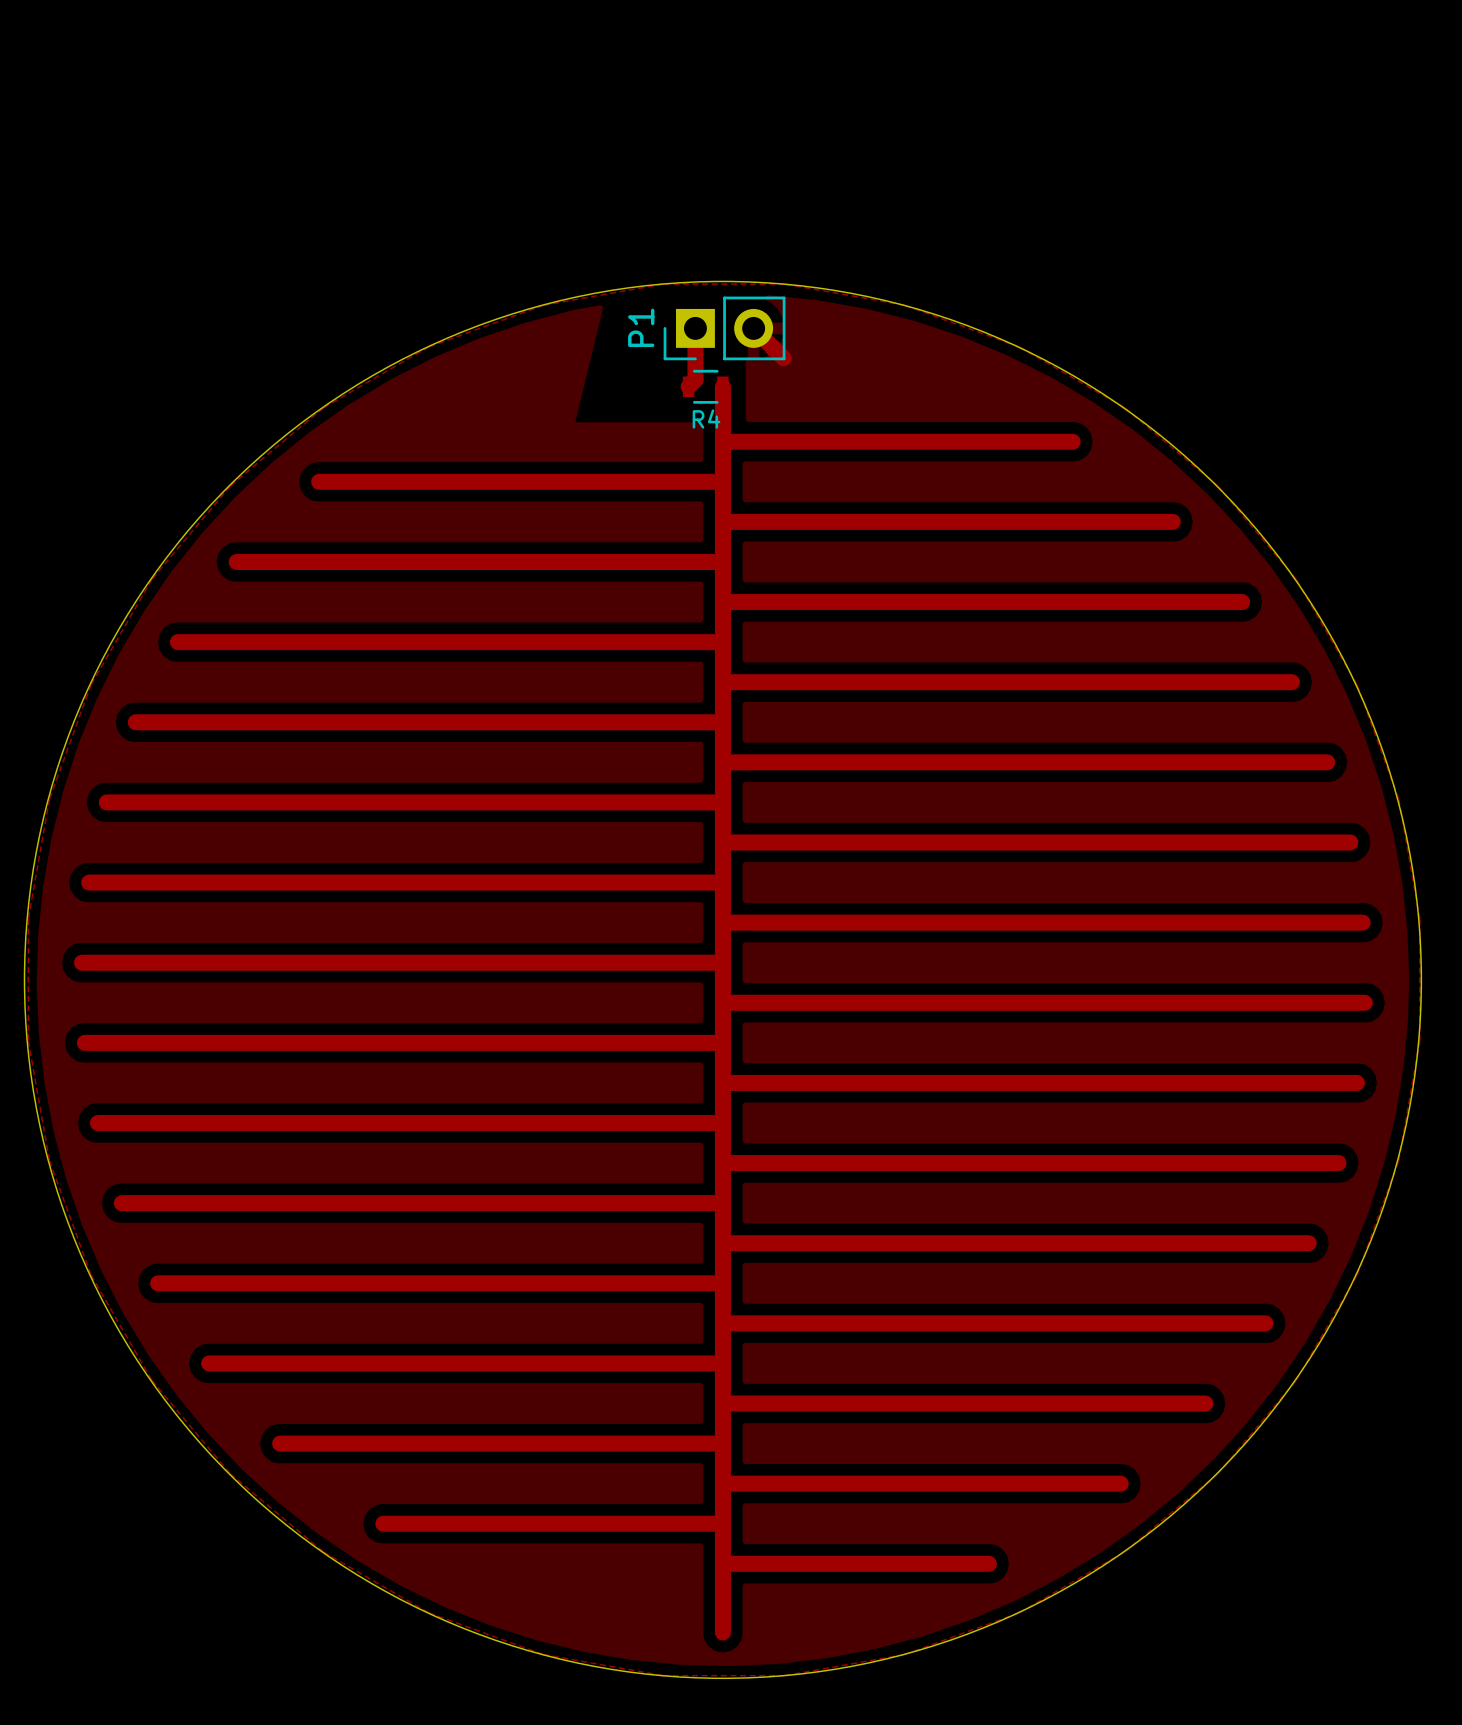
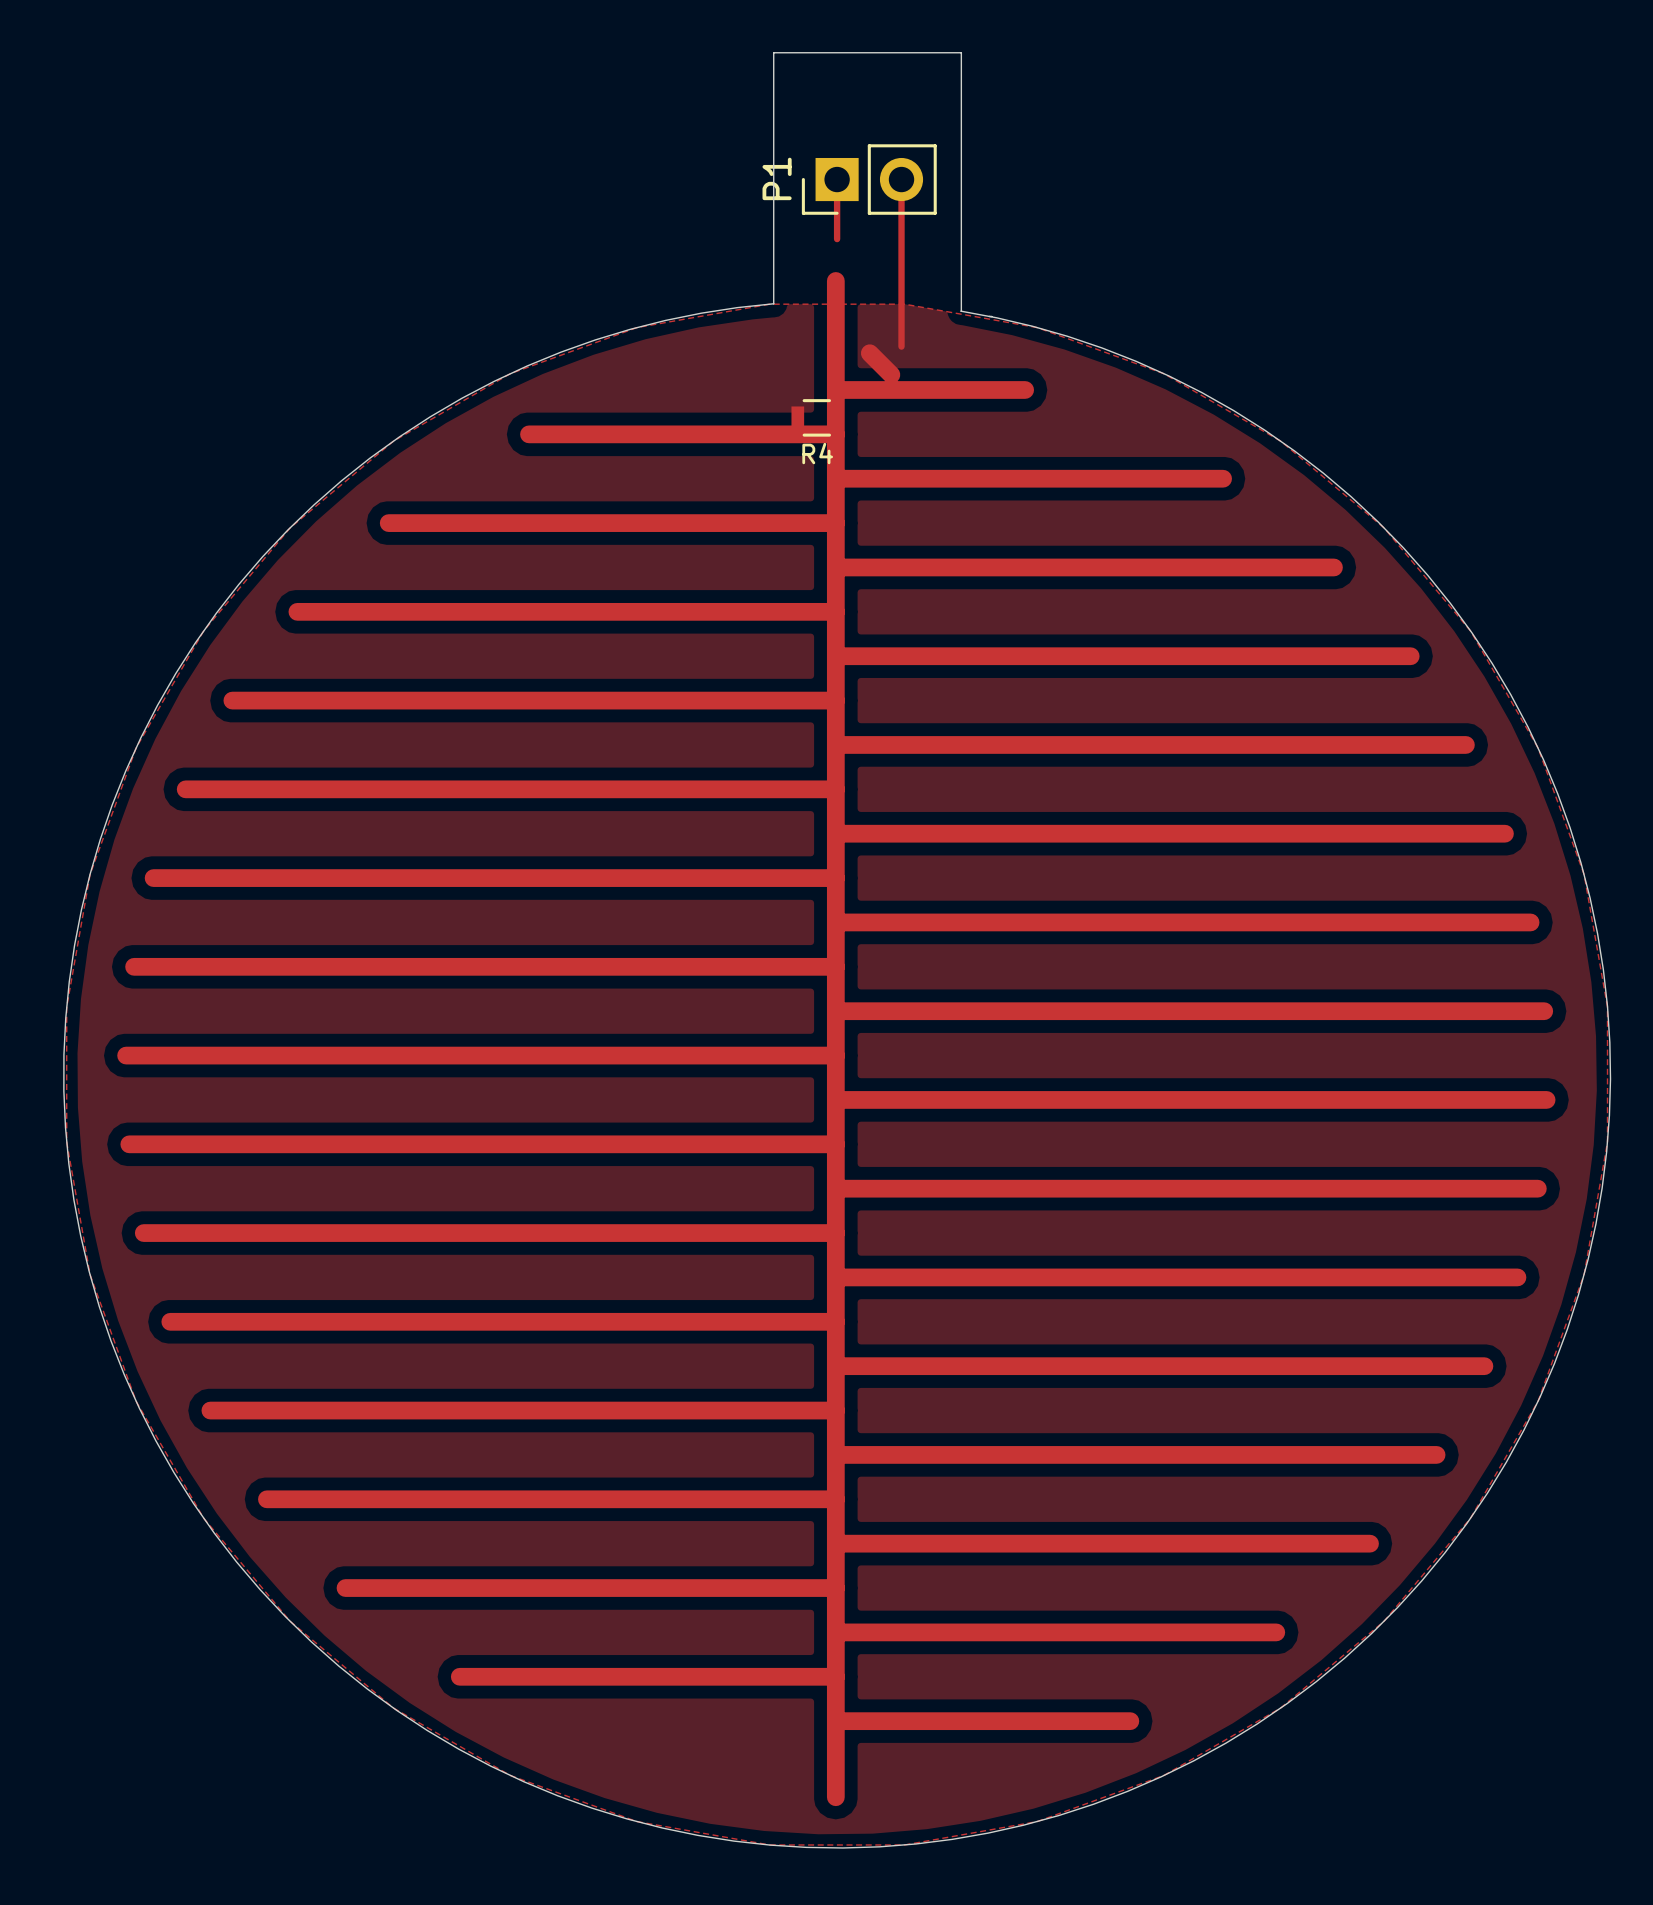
track: none -> (837, 179) (837, 239)
track: none -> (901, 179) (901, 346)
track: none -> (835, 280) (835, 417)
round board edge: [23, 280, 1422, 1679] -> none
board edge: none -> (960, 311) (996, 317) (1032, 326) (1102, 347) (1169, 376) (1233, 410) (1264, 430) (1323, 473) (1377, 521) (1427, 575) (1472, 632) (1510, 694) (1543, 759) (1570, 827) (1590, 898) (1597, 933) (1607, 1006) (1610, 1079) (1606, 1151) (1595, 1224) (1578, 1294) (1554, 1363) (1523, 1430) (1487, 1493) (1445, 1552) (1397, 1607) (1344, 1658) (1316, 1681) (1257, 1724) (1194, 1760) (1127, 1791) (1058, 1815) (988, 1833) (915, 1843) (843, 1847) (770, 1845) (697, 1835) (626, 1818) (557, 1795) (490, 1766) (427, 1730) (367, 1688) (311, 1641) (260, 1589) (214, 1533) (173, 1472) (139, 1408) (111, 1340) (89, 1271) (80, 1235) (68, 1163) (63, 1091) (65, 1018) (74, 945) (90, 874) (112, 804) (125, 771) (157, 705) (195, 642) (238, 584) (287, 530) (314, 504) (370, 458) (430, 416) (461, 398) (527, 366) (595, 339) (665, 320) (701, 313) (773, 303) (773, 52) (961, 52) (961, 311)
track: (695, 328) (695, 379) (688, 386) -> none
P1 position: (724, 328) -> (869, 179)
track: (773, 347) (783, 358) -> none
track: none -> (837, 389) (1025, 389)
track: none -> (529, 434) (835, 434)

